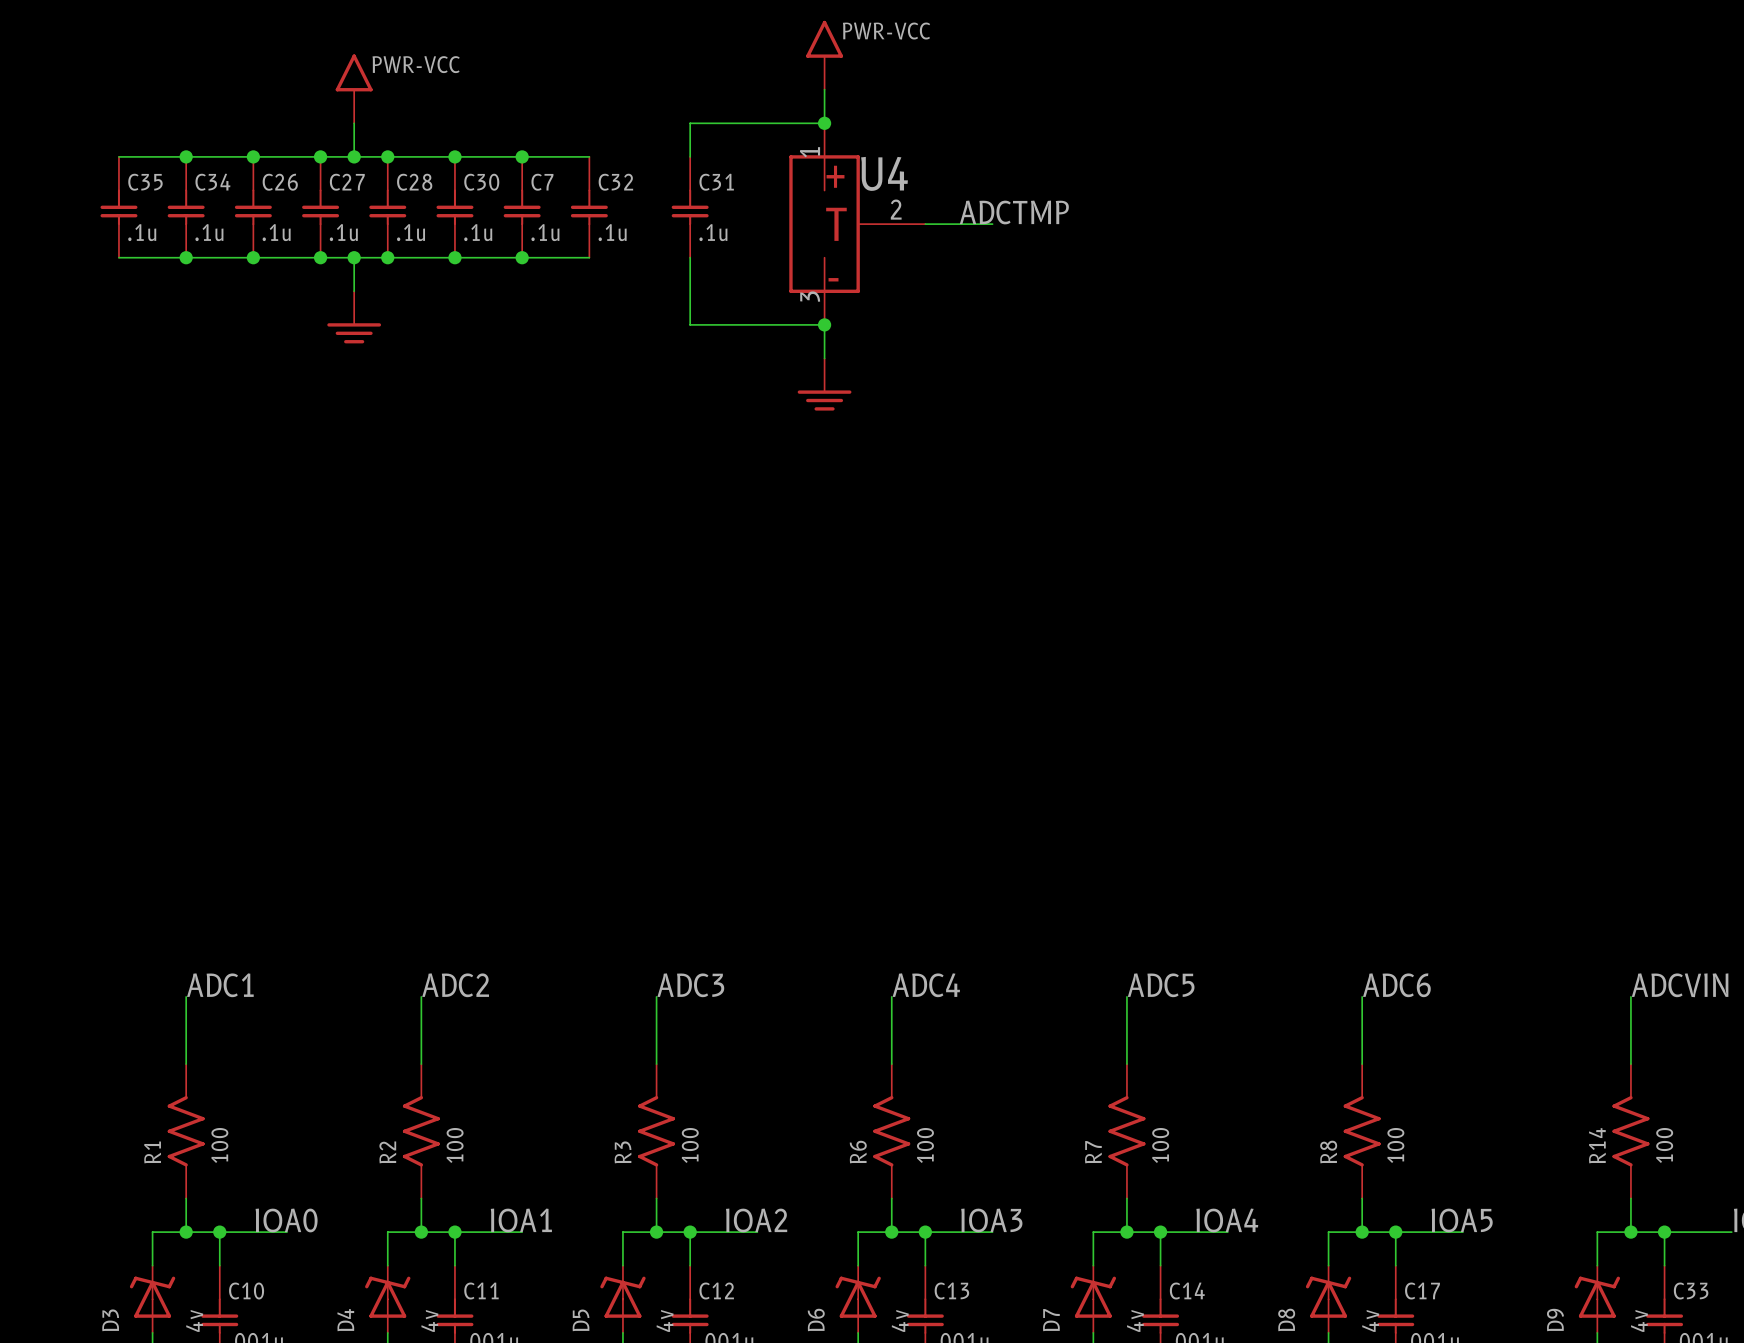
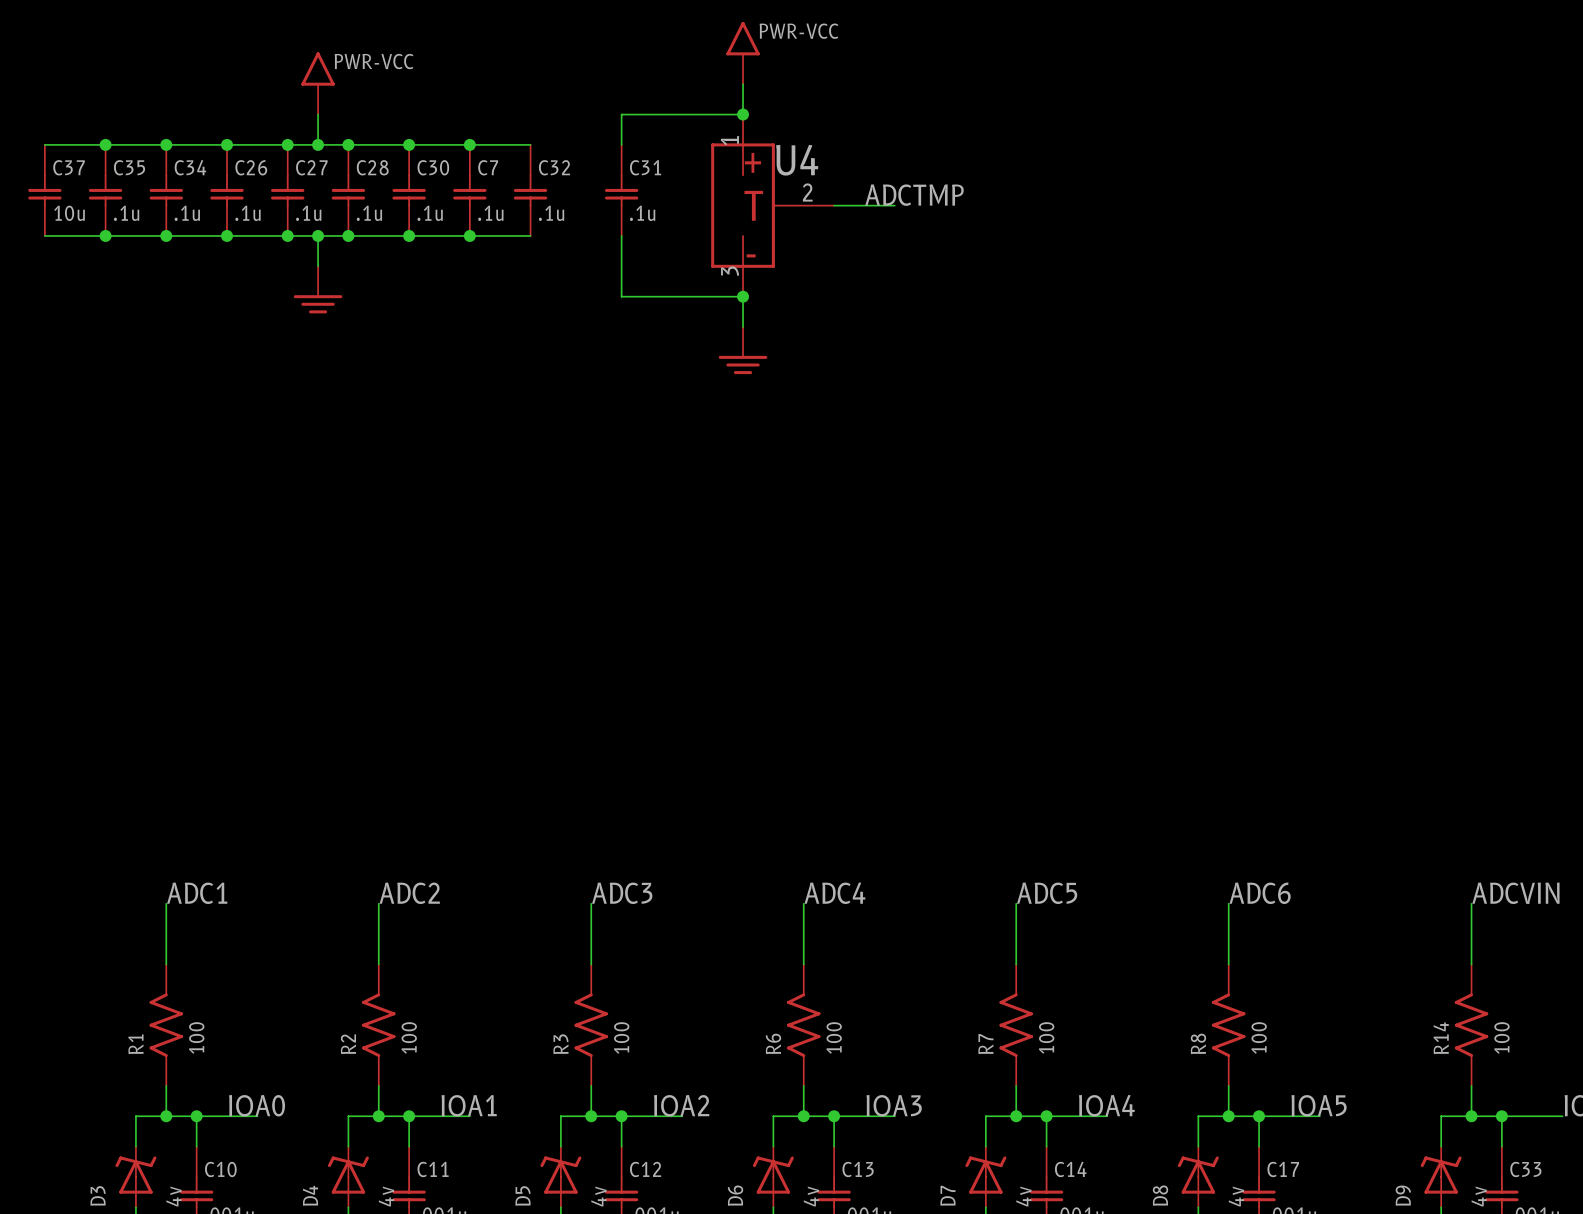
wire: none -> (44, 144) (105, 144)
junction: none -> (105, 144)
C37: none -> 10u (44, 190)
wire: none -> (44, 235) (105, 235)
junction: none -> (105, 235)

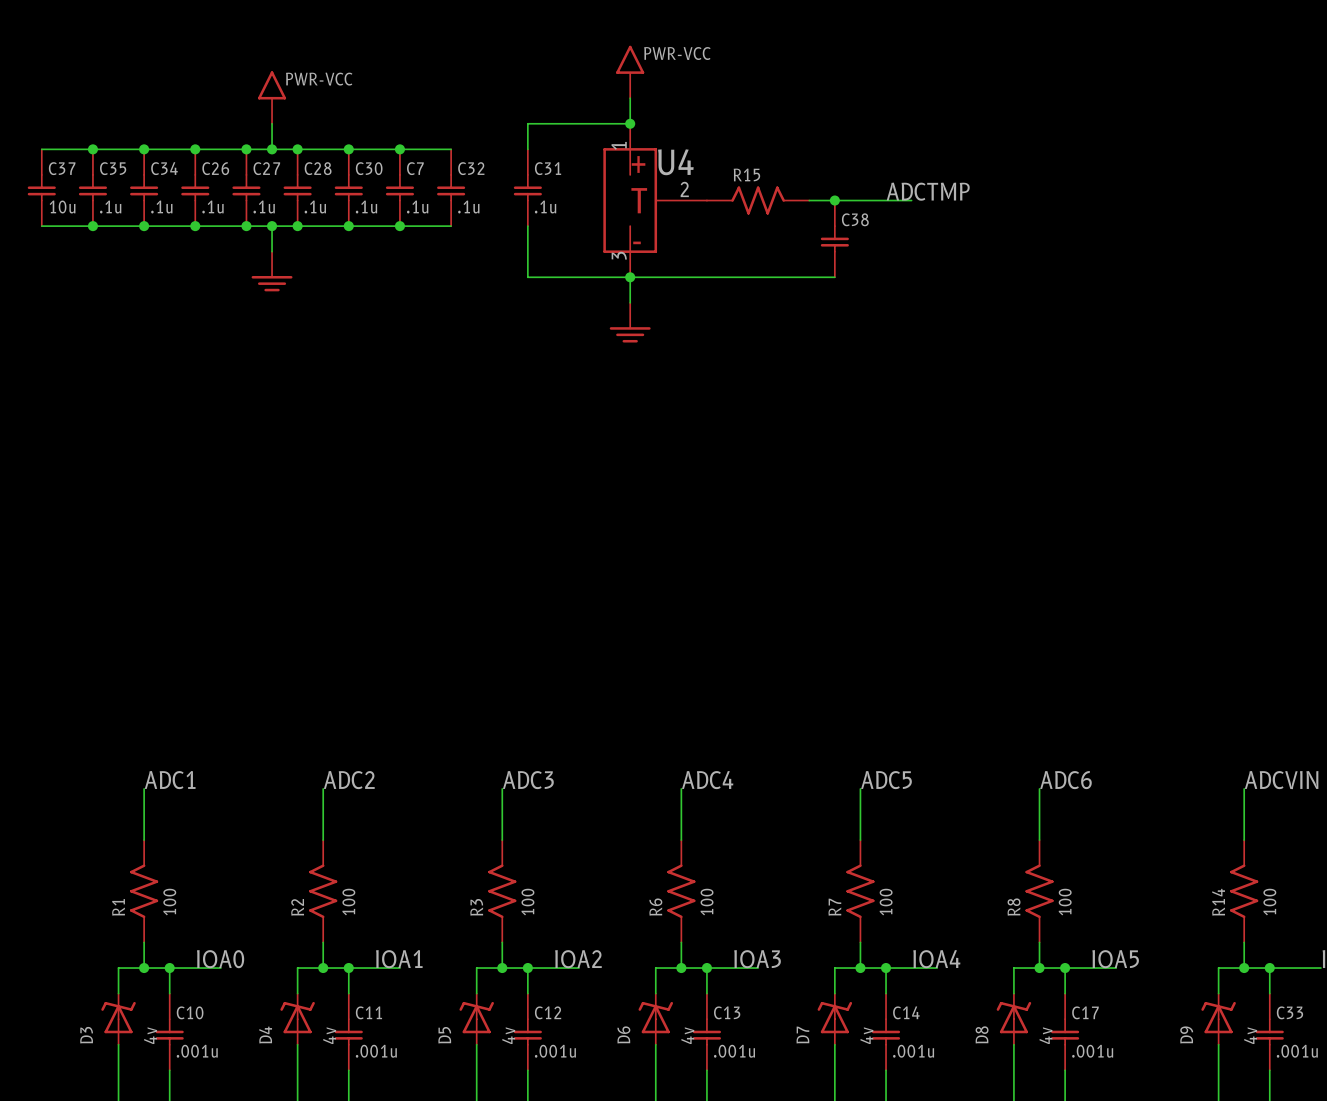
label position: ADCTMP (914, 195) -> ADCTMP (928, 191)
R15: none -> (758, 200)
wire: none -> (809, 200) (911, 200)
junction: none -> (834, 200)
C38: none -> (834, 238)
wire: none -> (630, 277) (834, 277)

